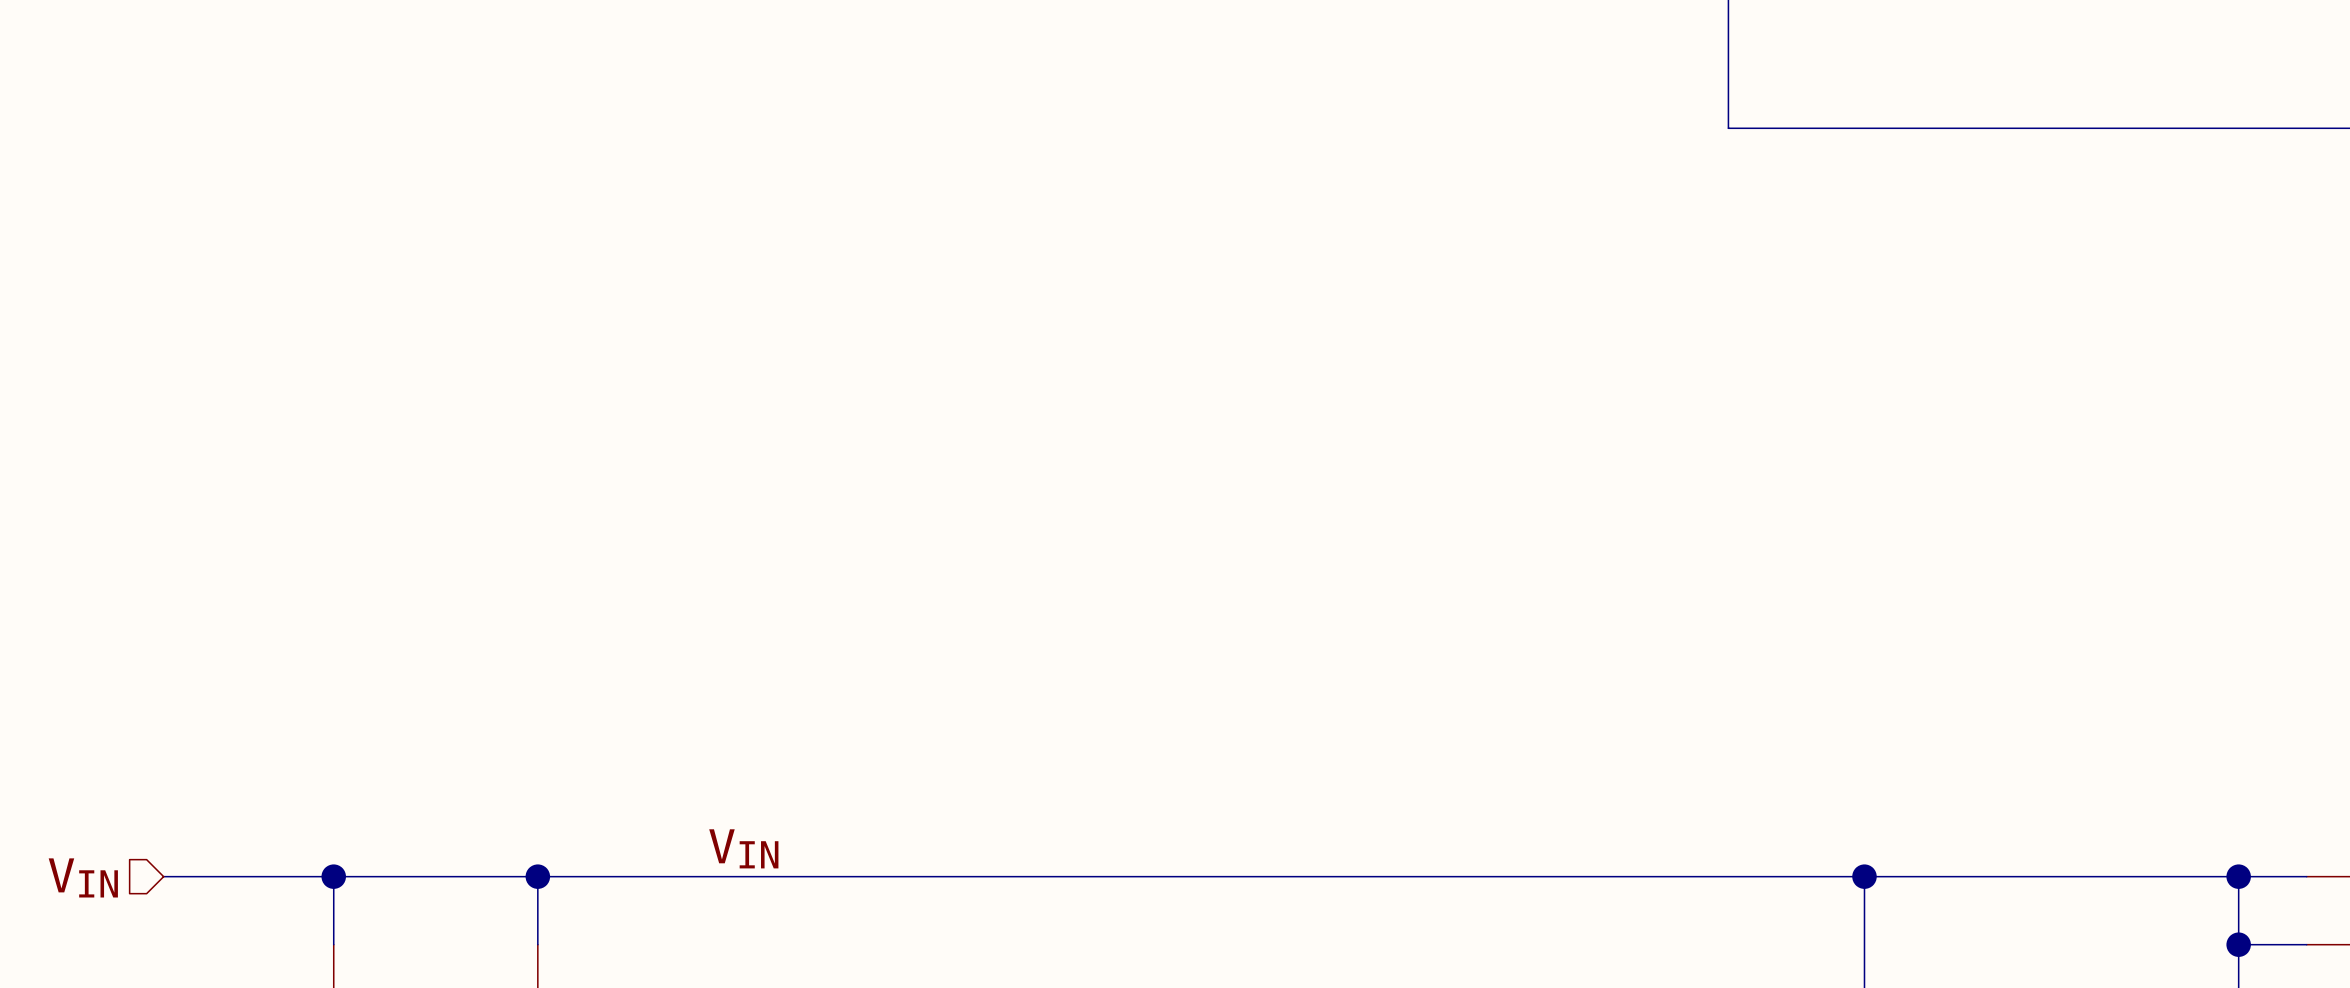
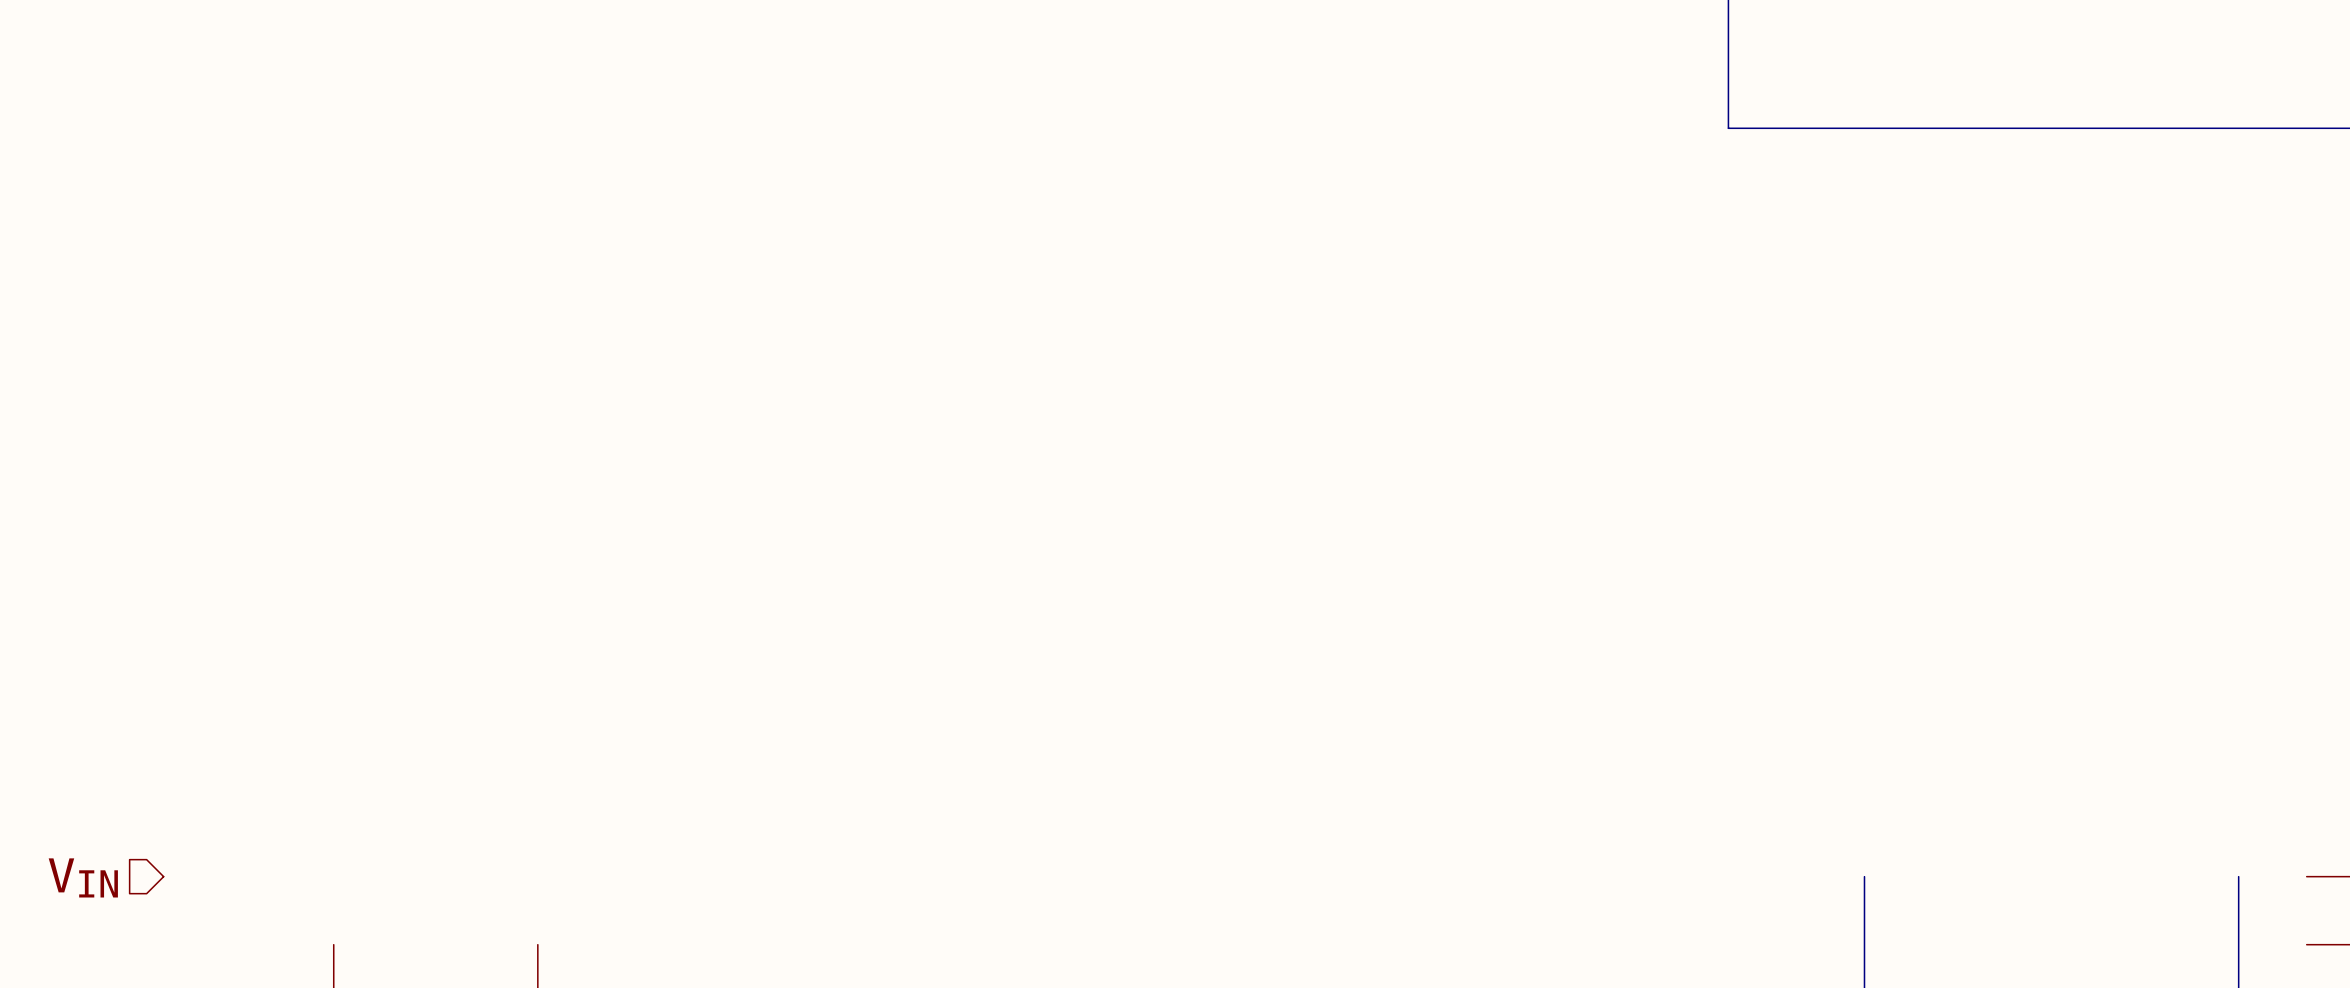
label: VIN (743, 848) -> none
wire: (163, 876) (2306, 876) -> none
wire: (333, 876) (333, 944) -> none
junction: (333, 876) -> none
wire: (537, 876) (537, 944) -> none
junction: (537, 876) -> none
junction: (1864, 876) -> none
junction: (2238, 876) -> none
wire: (2238, 944) (2306, 944) -> none
junction: (2238, 944) -> none

